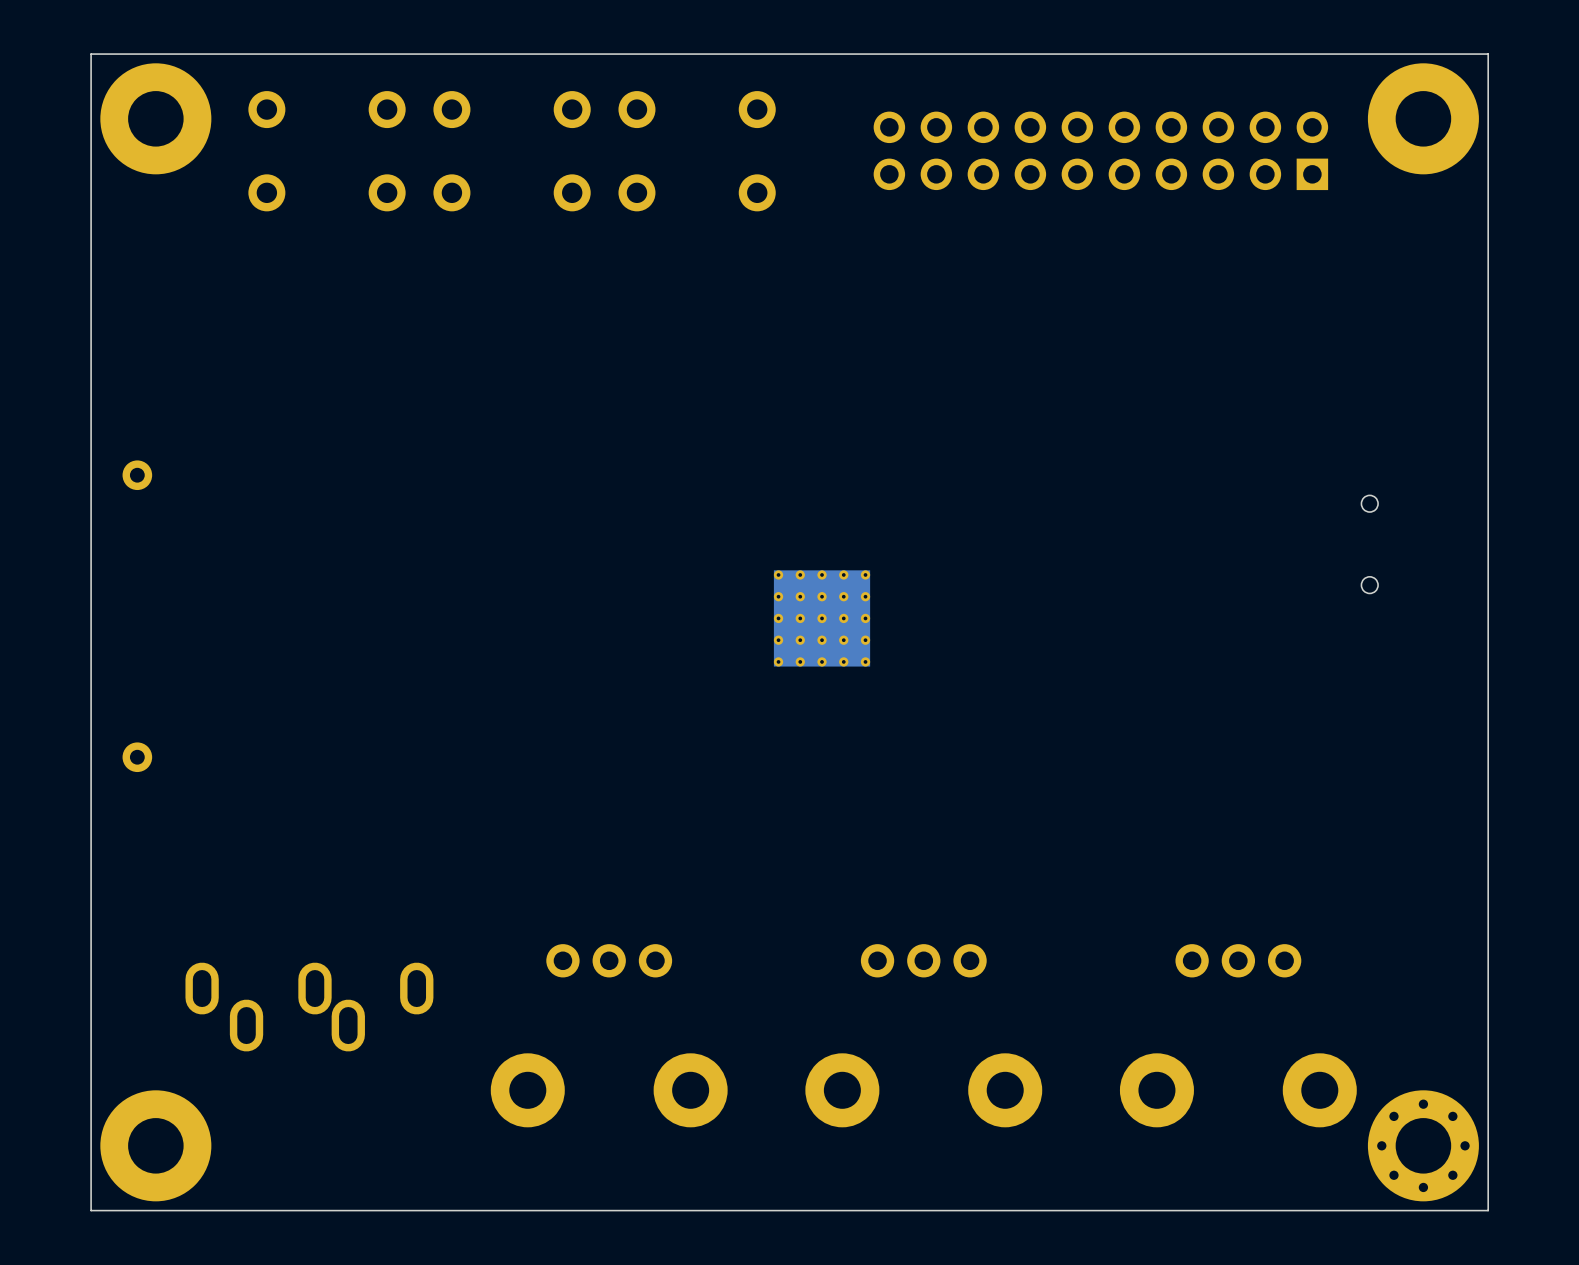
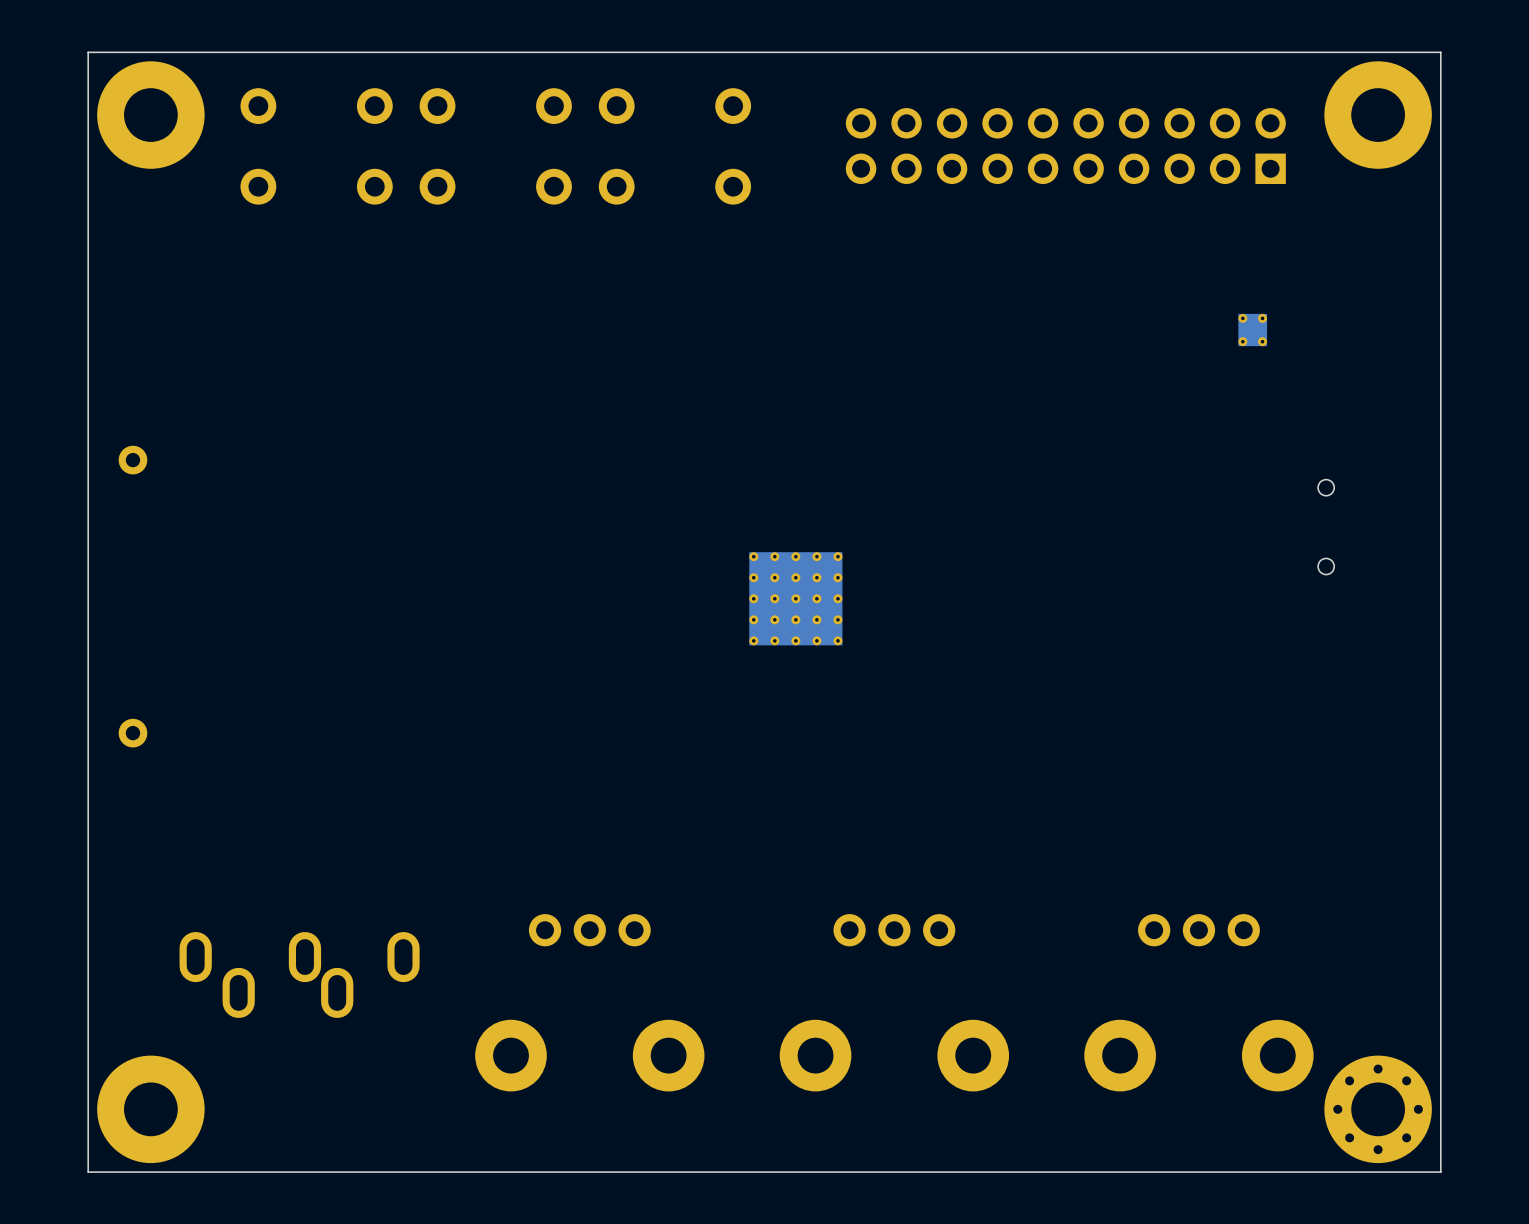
part: none -> (1252, 330)

